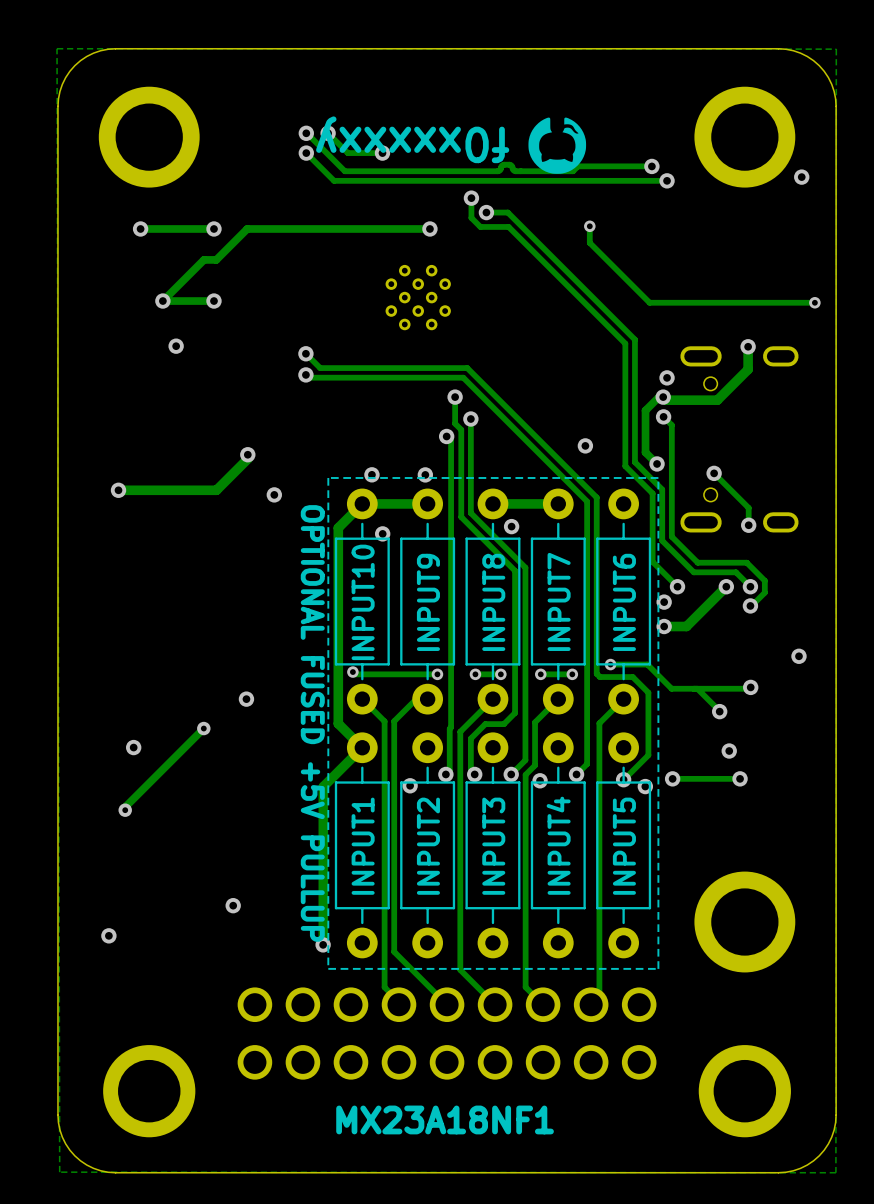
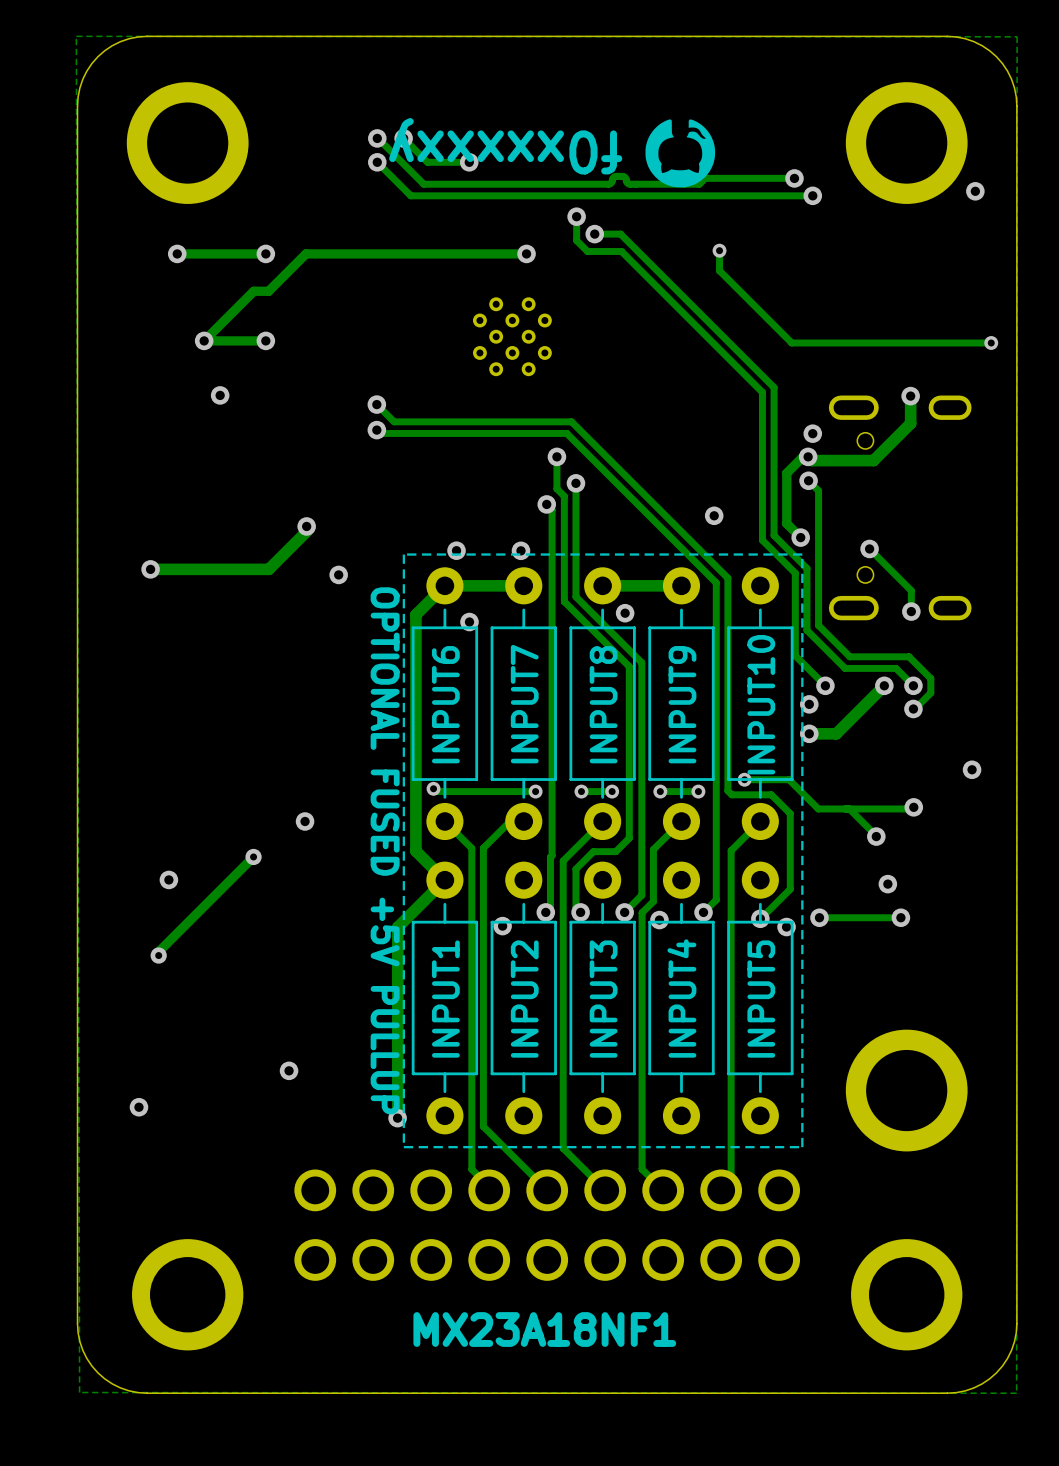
text: INPUT7 (559, 601) -> INPUT9 (682, 704)
text position: INPUT10 (363, 602) -> INPUT10 (761, 704)
text: INPUT9 (428, 602) -> INPUT7 (524, 704)
text position: INPUT6 (624, 602) -> INPUT6 (445, 704)

